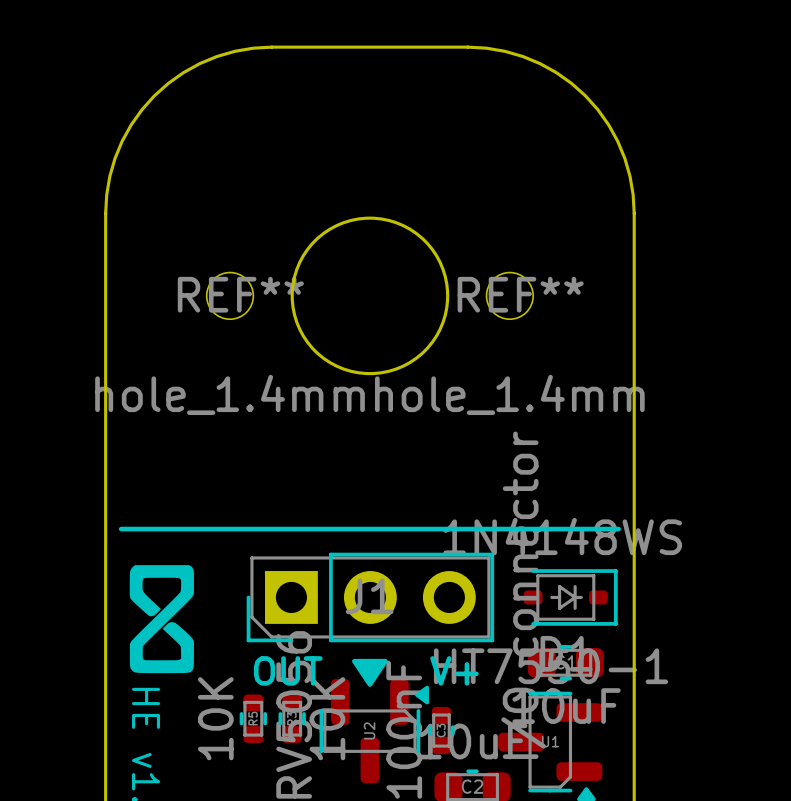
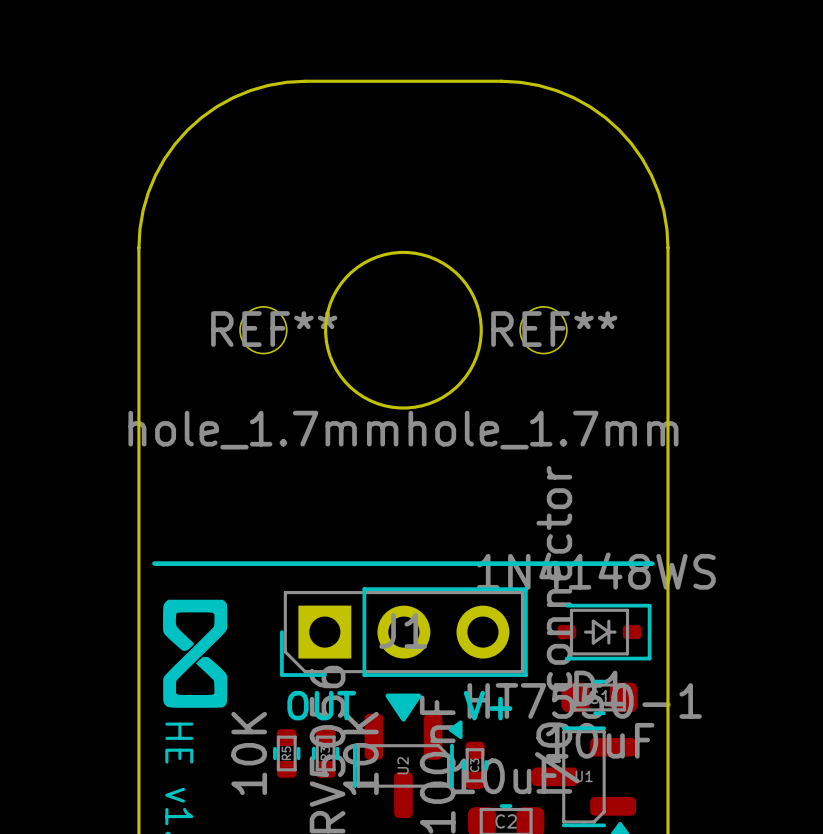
REF** value: hole_1.4mm (230, 394) -> hole_1.7mm (263, 430)
REF** value: hole_1.4mm (509, 394) -> hole_1.7mm (543, 430)

